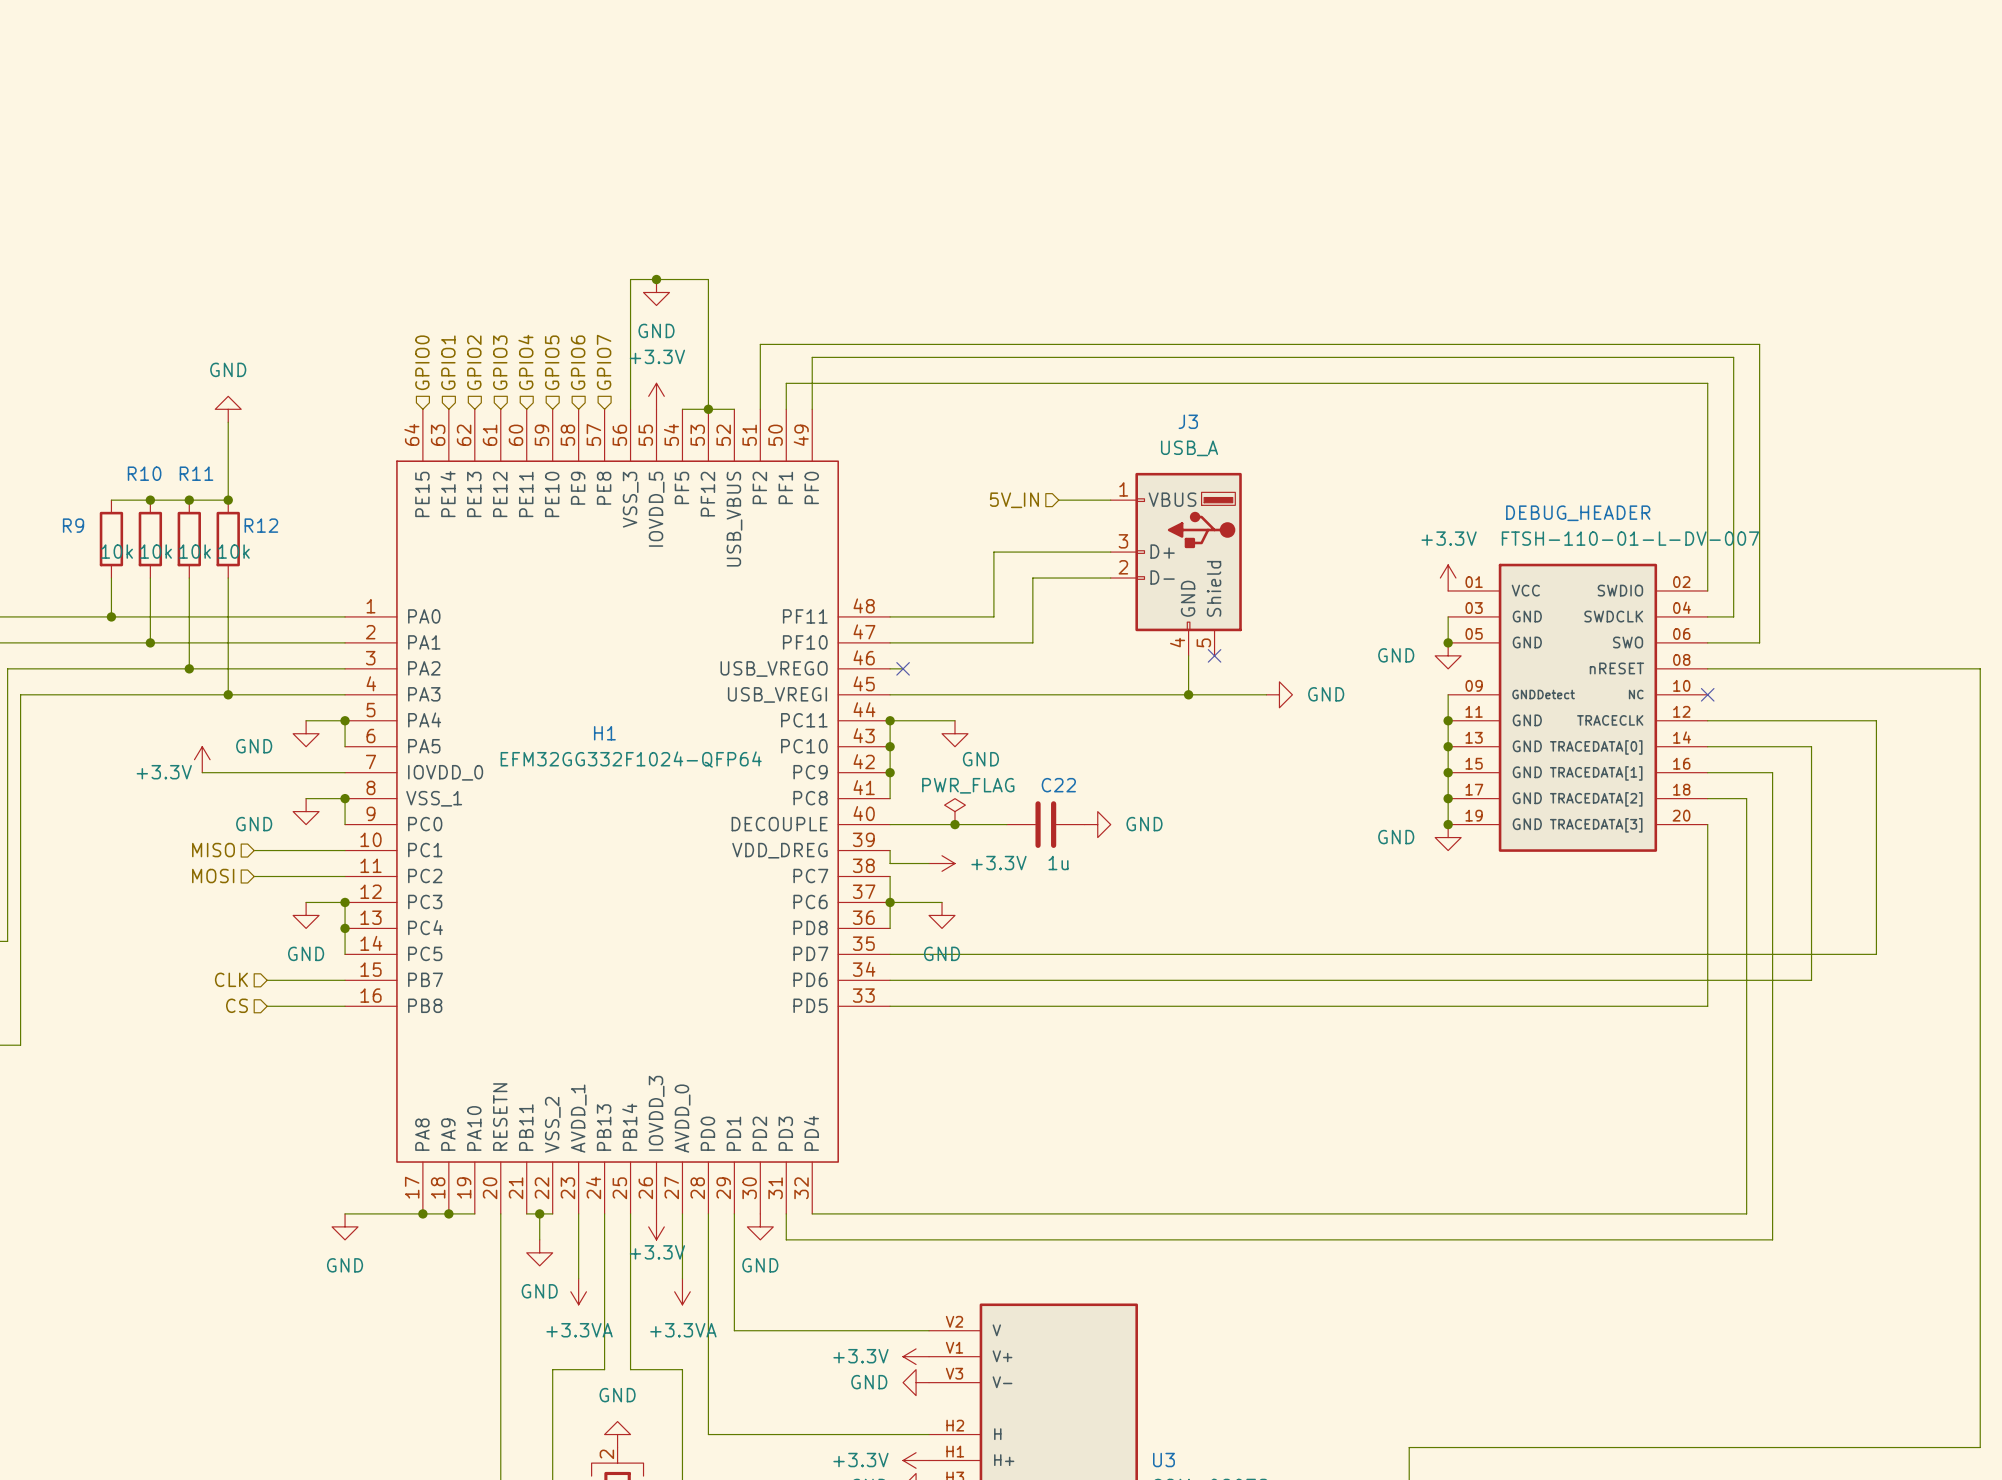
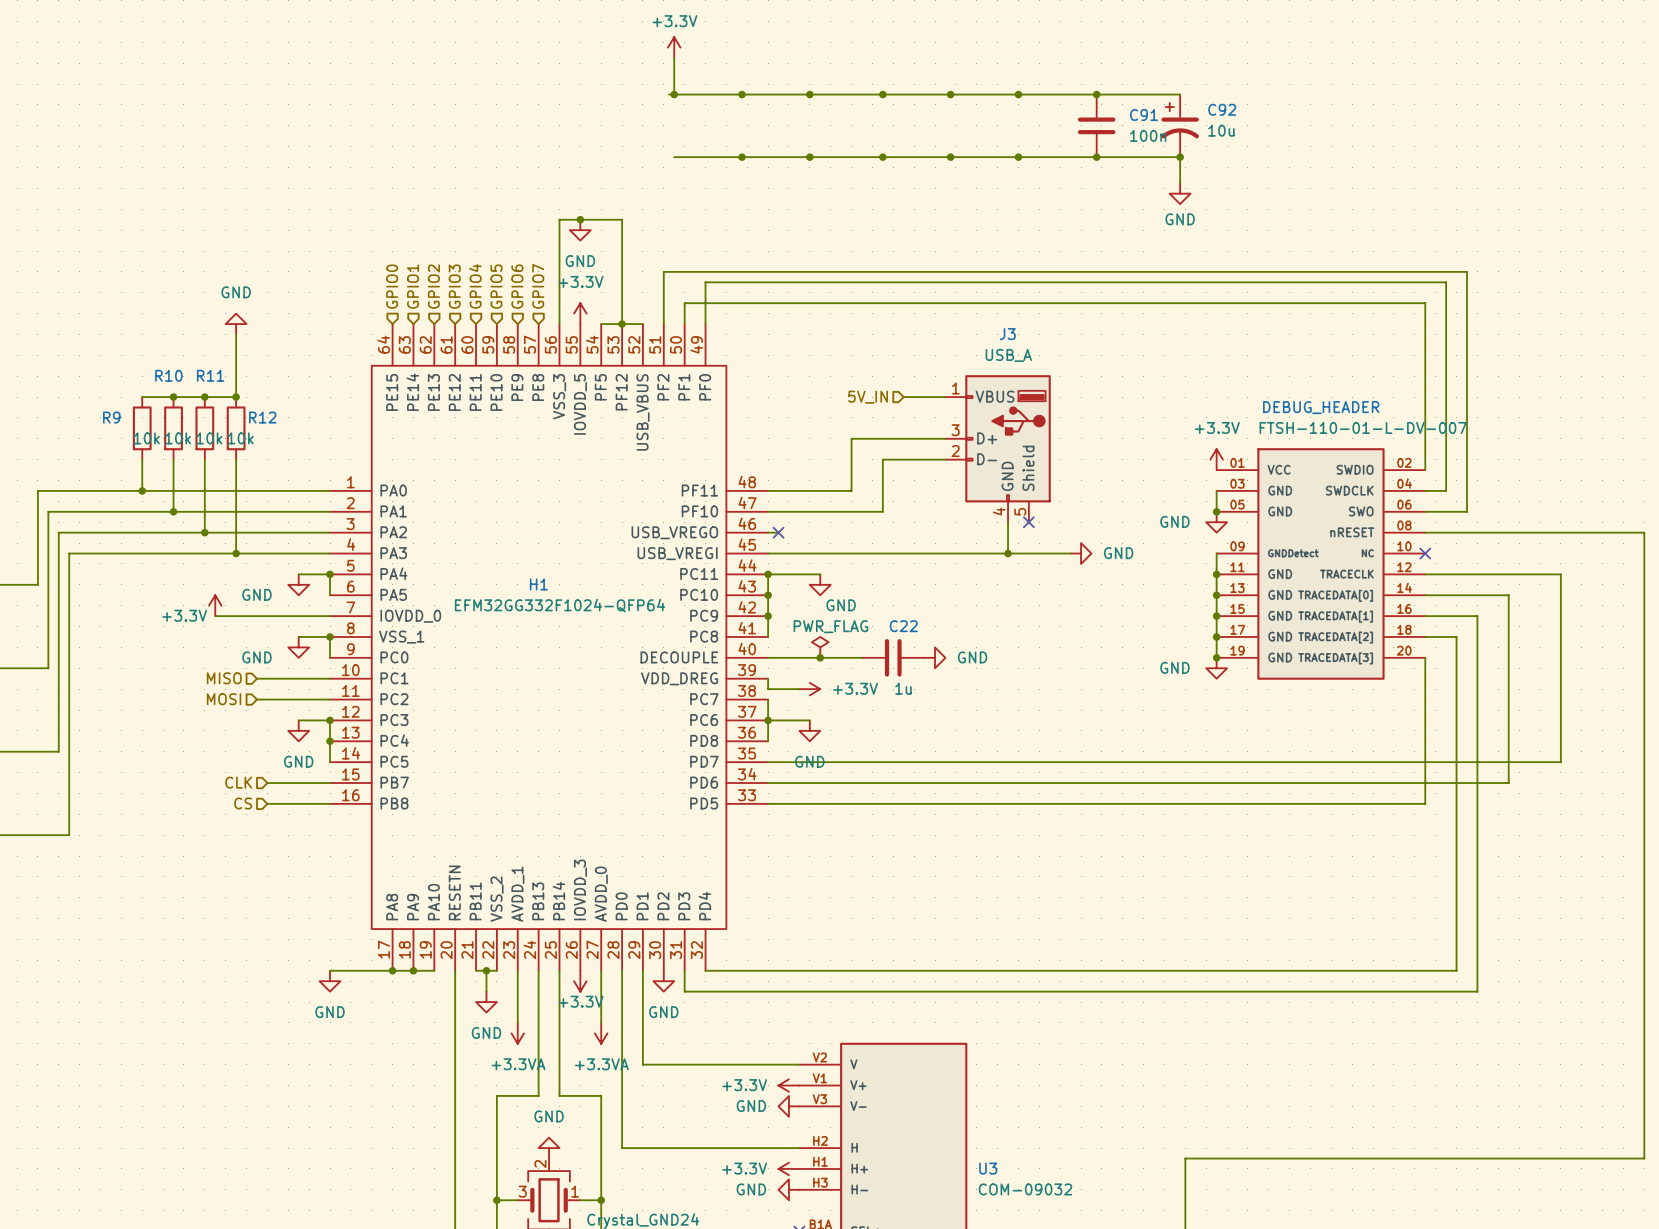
power symbol: none -> +3.3V (674, 47)
wire: none -> (674, 58) (674, 94)
wire: none -> (669, 94) (1180, 94)
junction: none -> (674, 94)
junction: none -> (742, 94)
junction: none -> (809, 94)
junction: none -> (882, 94)
junction: none -> (950, 94)
junction: none -> (1018, 94)
junction: none -> (1096, 94)
C91: none -> 100n (1096, 125)
C92: none -> 10u (1180, 125)
wire: none -> (674, 157) (1180, 157) (1180, 183)
junction: none -> (742, 157)
junction: none -> (809, 157)
junction: none -> (882, 157)
junction: none -> (950, 157)
junction: none -> (1018, 157)
junction: none -> (1096, 157)
junction: none -> (1180, 157)
power symbol: none -> GND (1180, 193)

